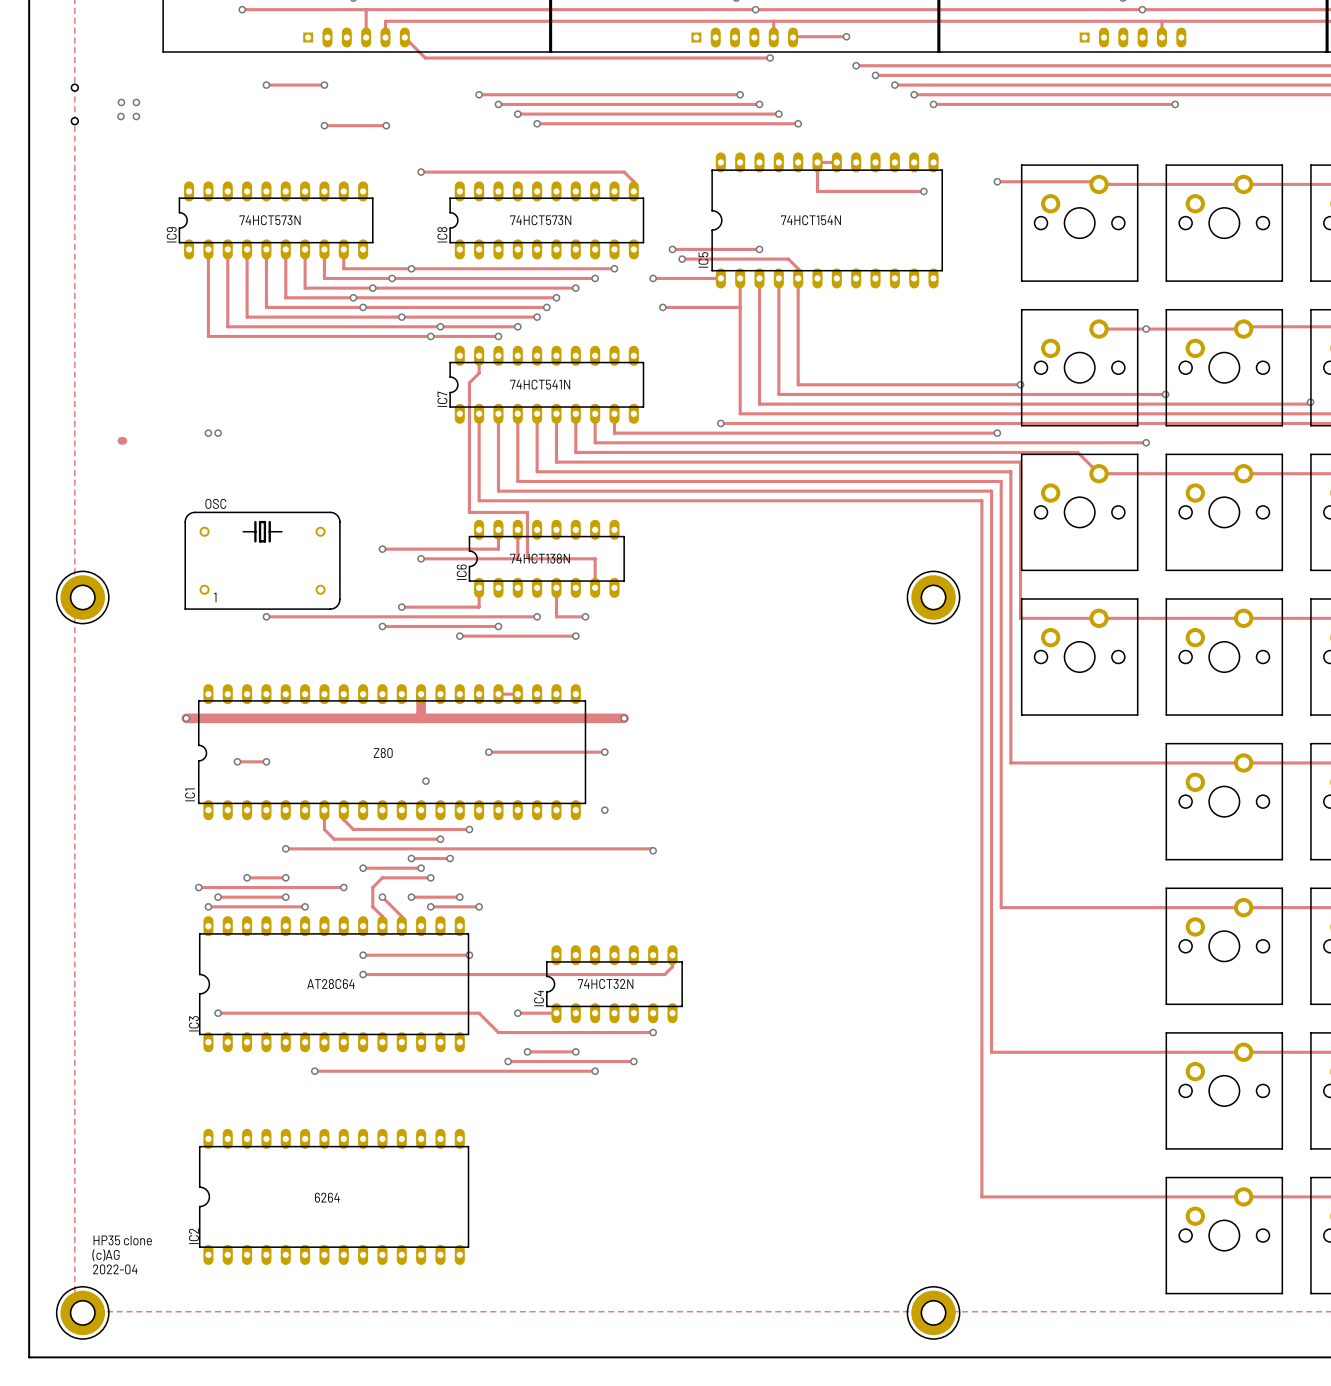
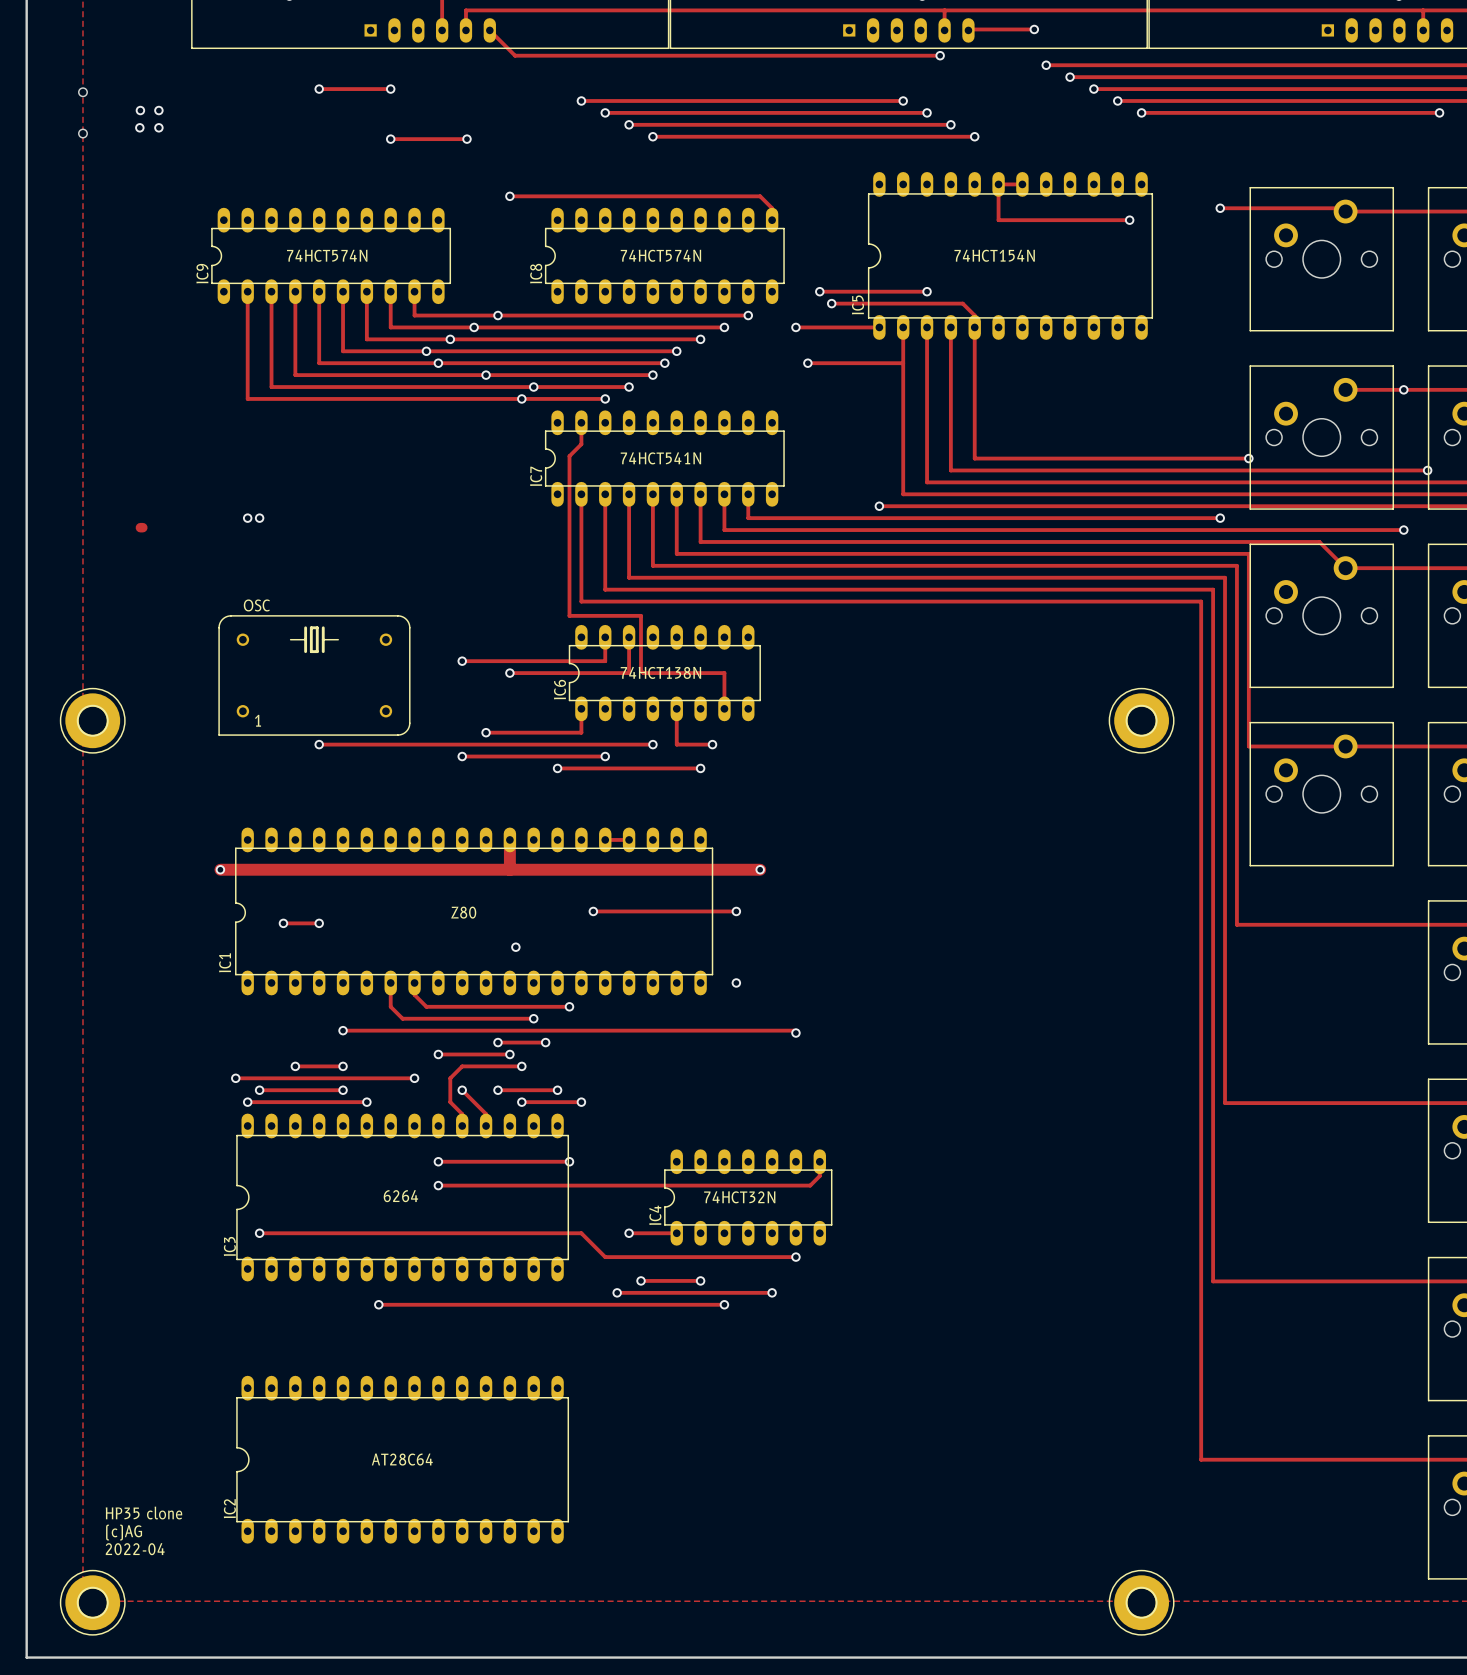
text: 74HCT573N (270, 220) -> 74HCT574N (327, 255)
text: 74HCT573N (540, 220) -> 74HCT574N (660, 255)
text: none -> 6264 (400, 1196)
text: AT28C64 (330, 984) -> none
text: 6264 (327, 1197) -> AT28C64 (402, 1459)

